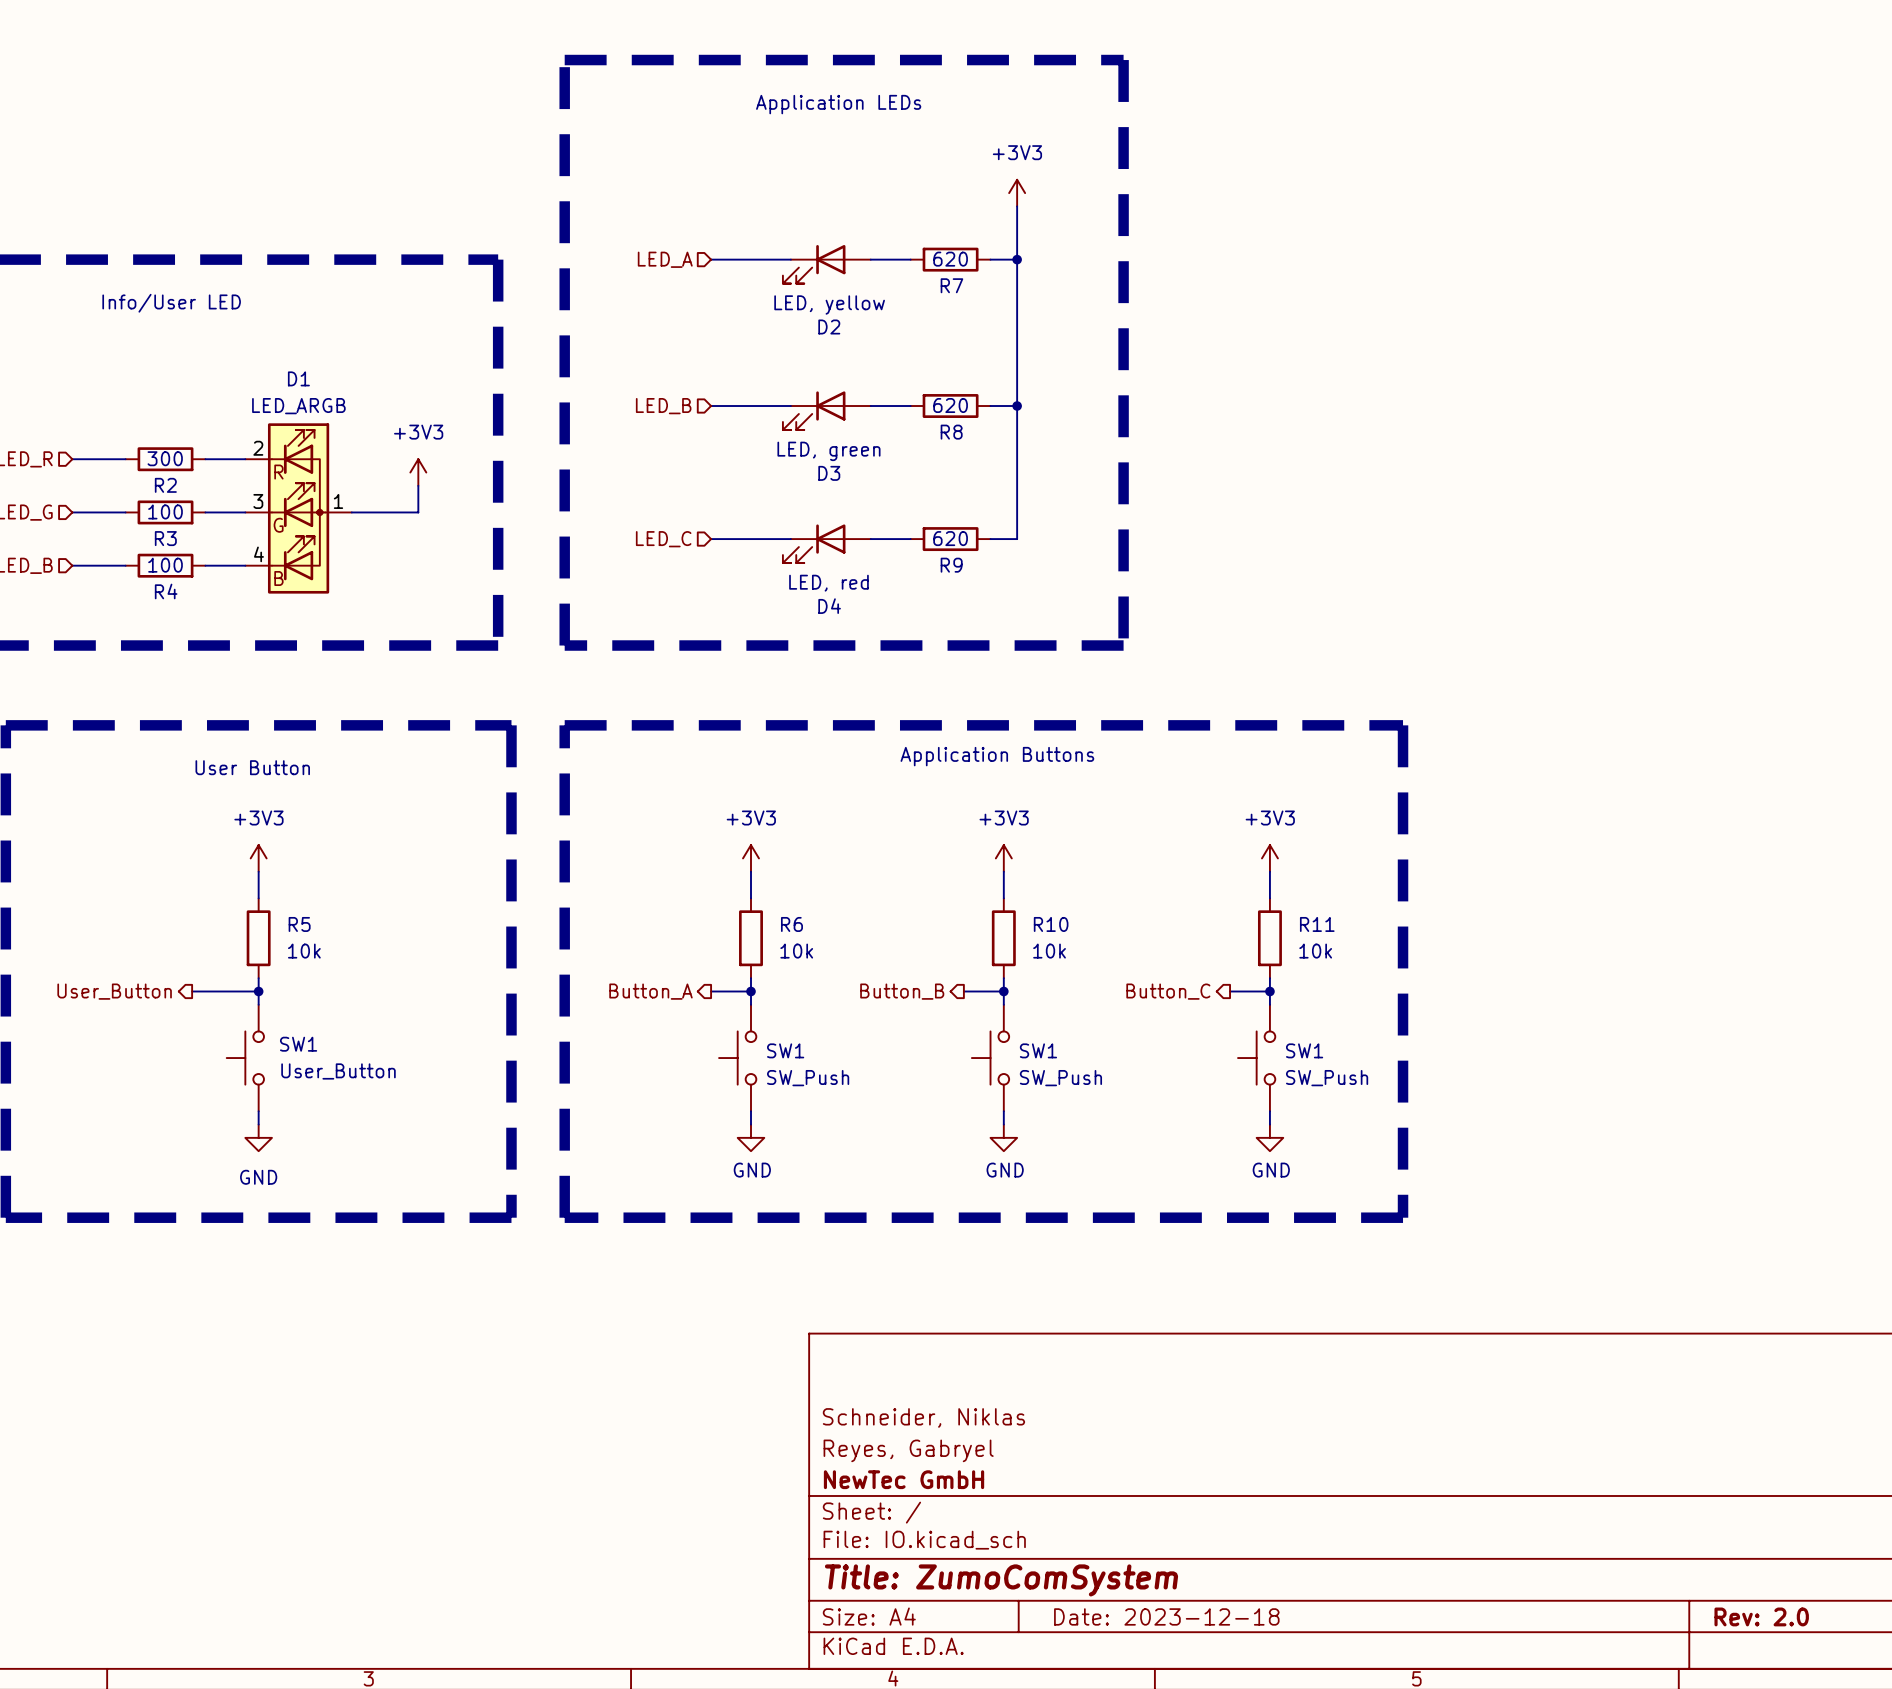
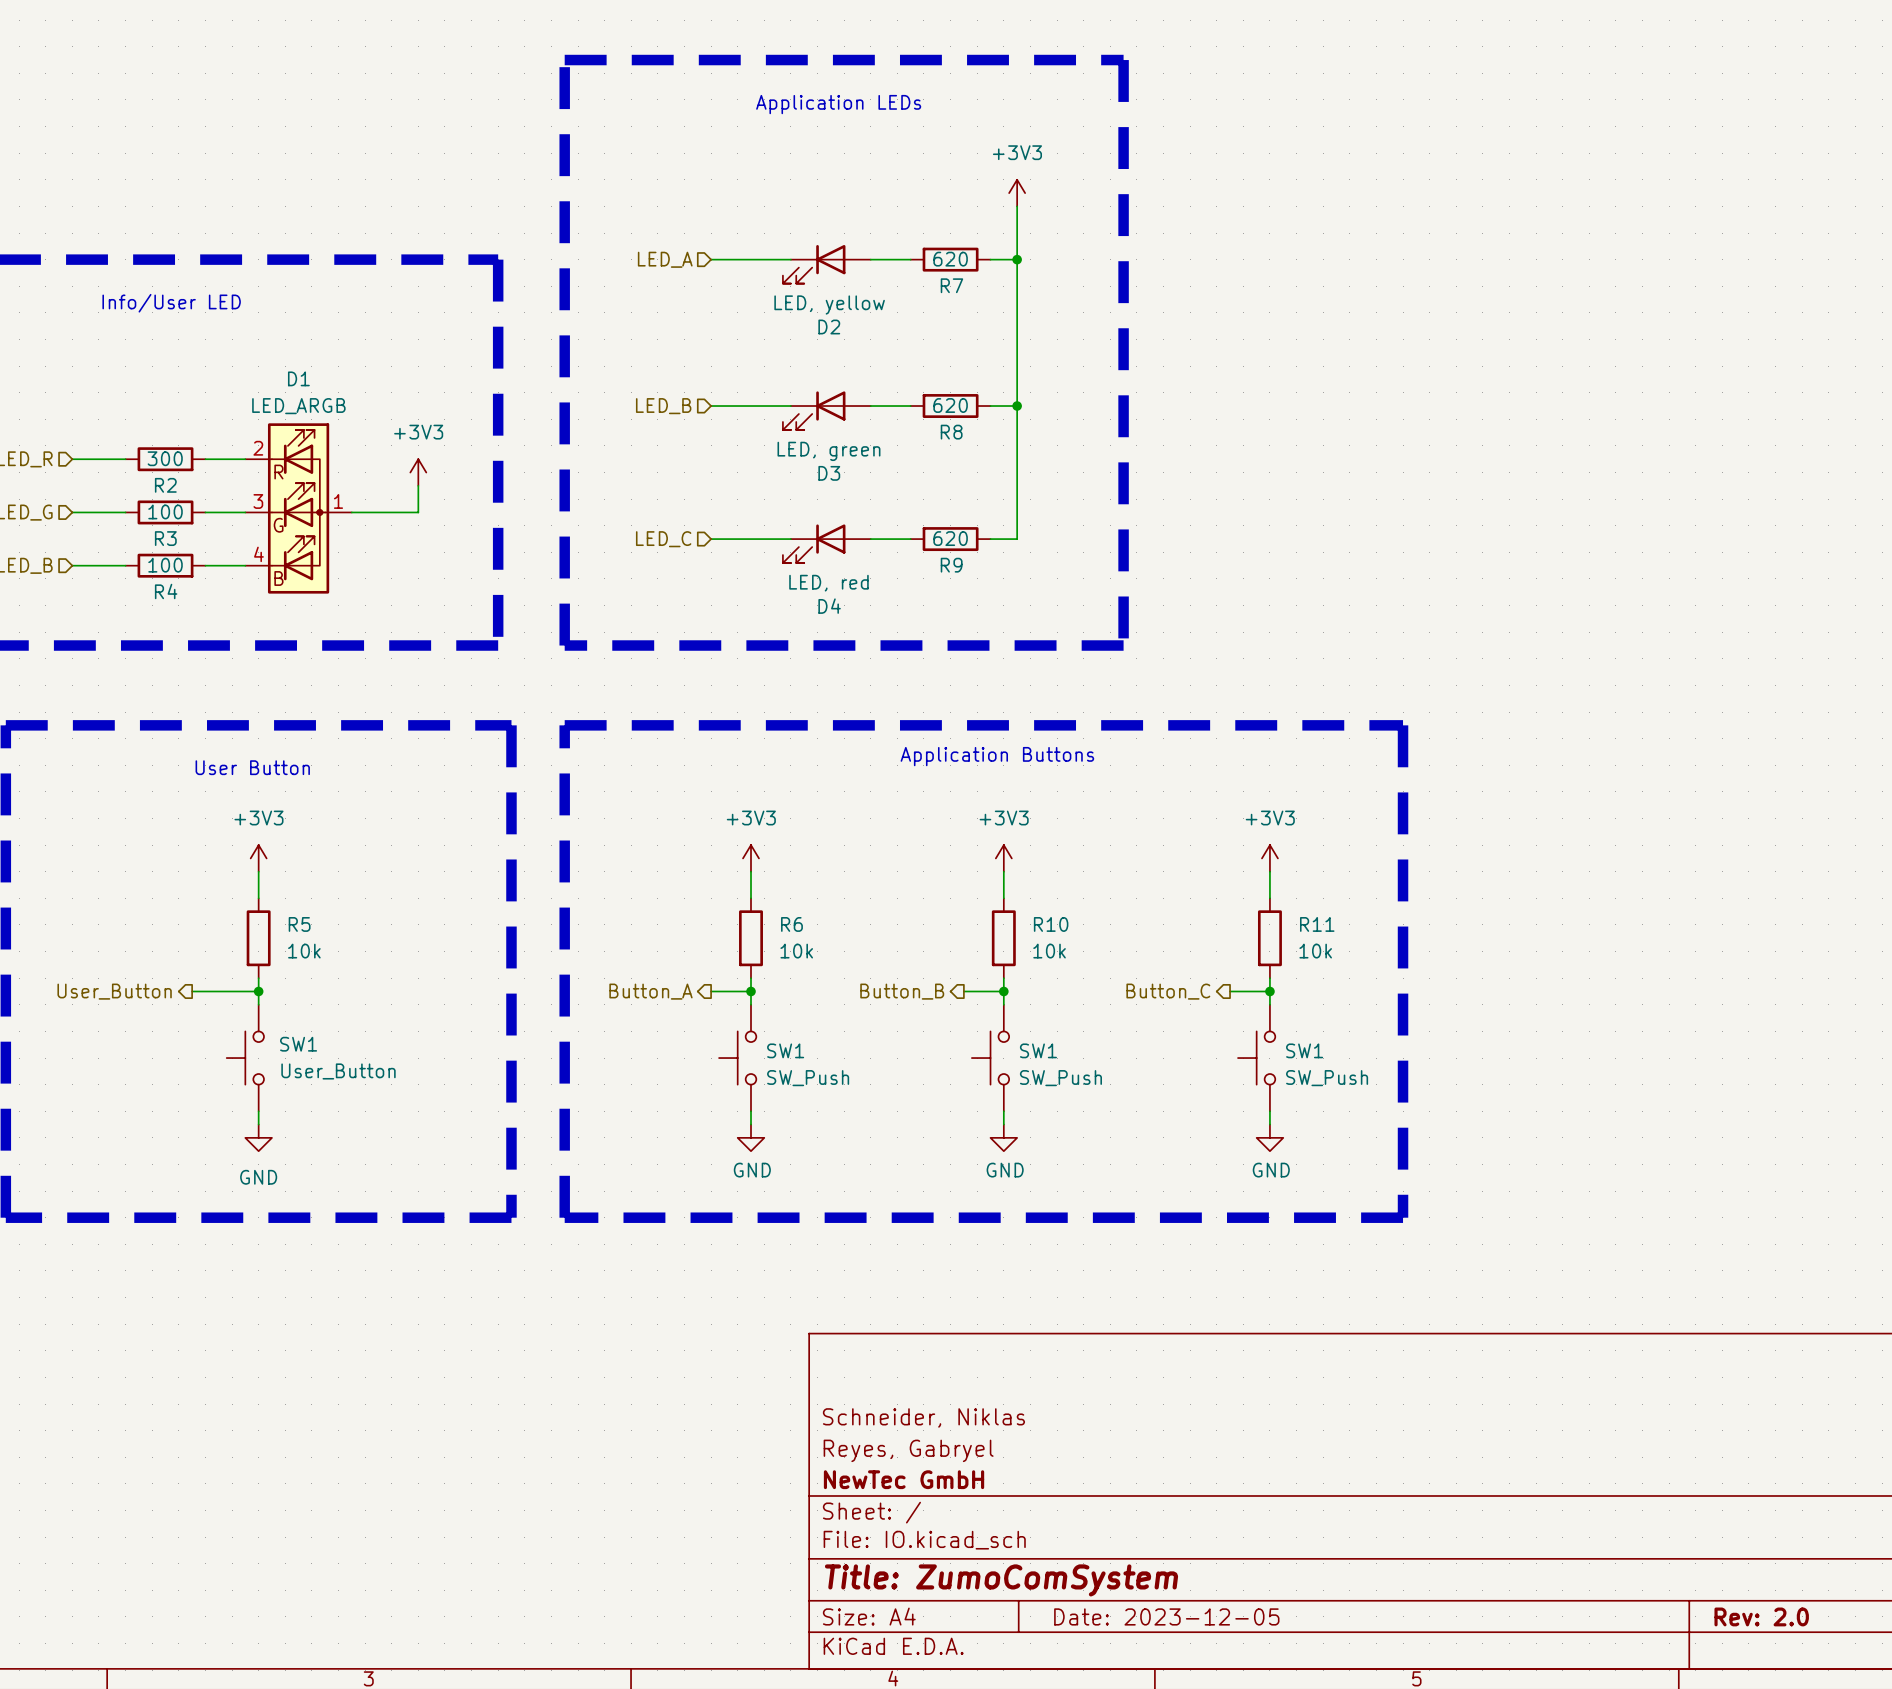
title block: Date: 2023-12-18 (1166, 1616) -> Date: 2023-12-05 (1166, 1616)

